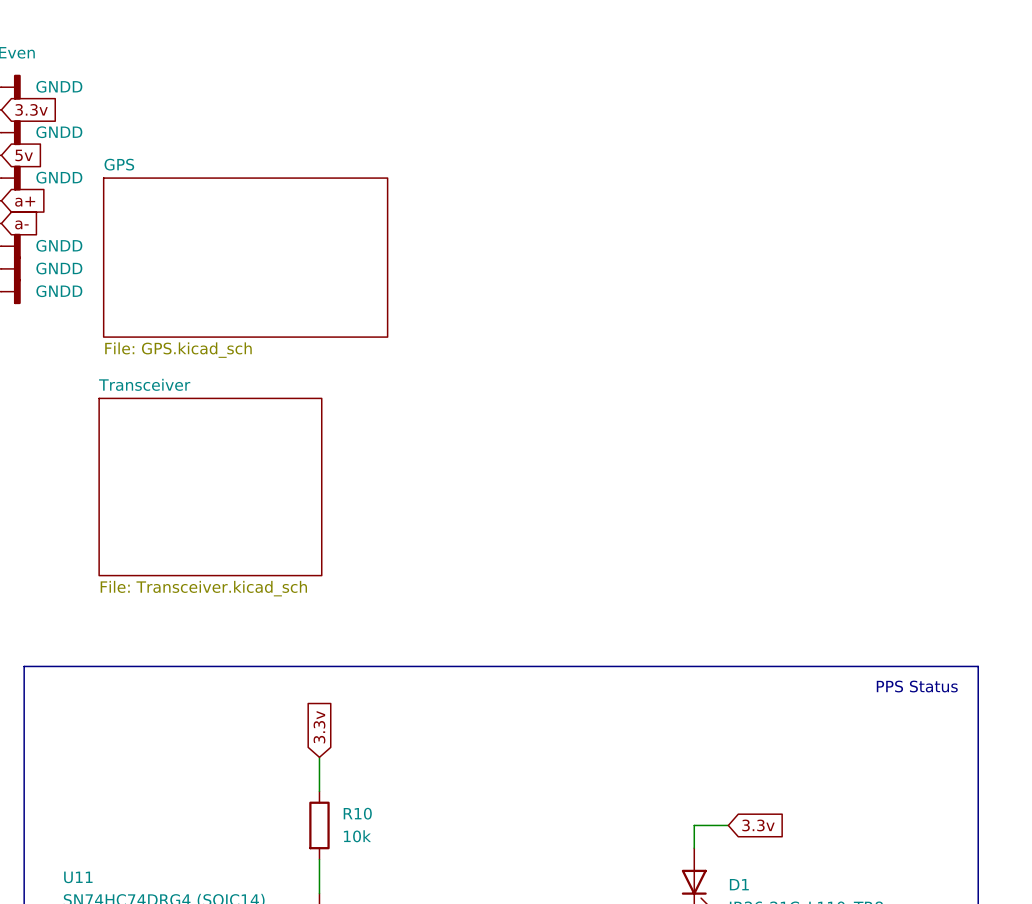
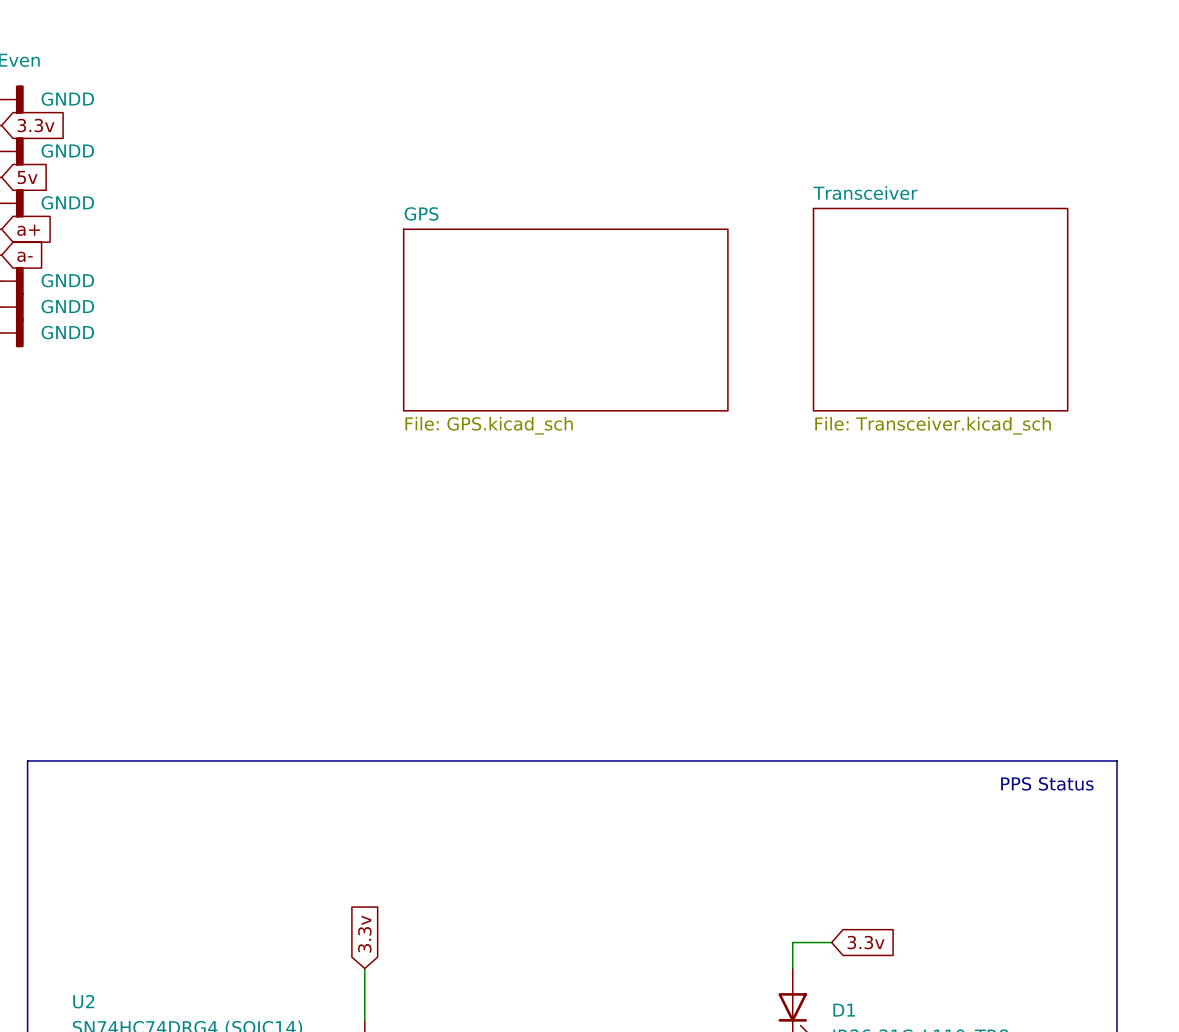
sheet GPS: File: GPS.kicad_sch (245, 257) -> none
sheet Transceiver: none -> File: Transceiver.kicad_sch (940, 309)
sheet GPS: none -> File: GPS.kicad_sch (565, 320)
sheet Transceiver: File: Transceiver.kicad_sch (210, 487) -> none
global label position: 3.3v (319, 727) -> 3.3v (364, 934)
wire: (319, 757) (319, 791) -> none
R10: 10k (319, 825) -> none
U11 name: U11 (78, 877) -> U2 (83, 1001)

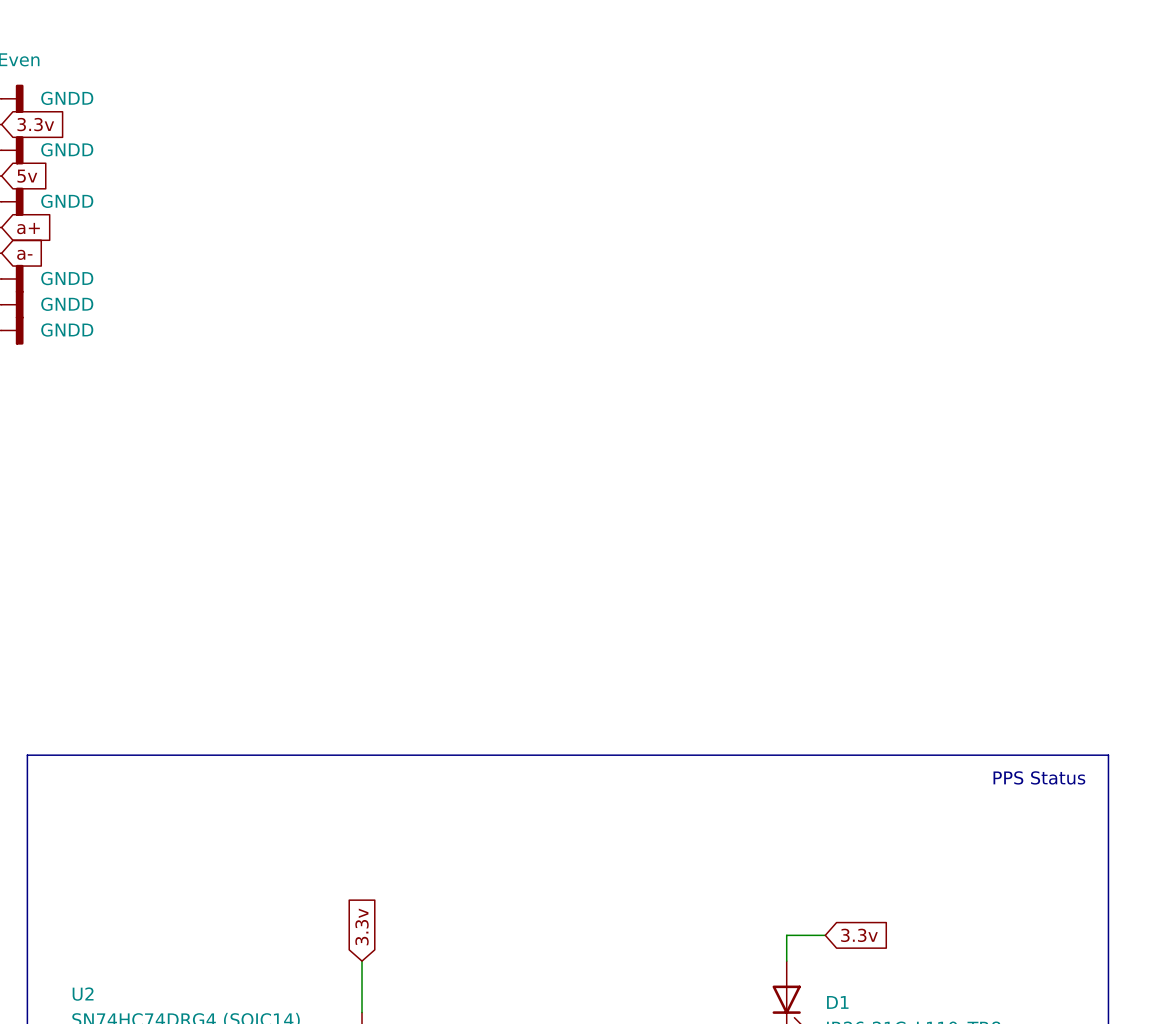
sheet Transceiver: File: Transceiver.kicad_sch (940, 309) -> none
sheet GPS: File: GPS.kicad_sch (565, 320) -> none

